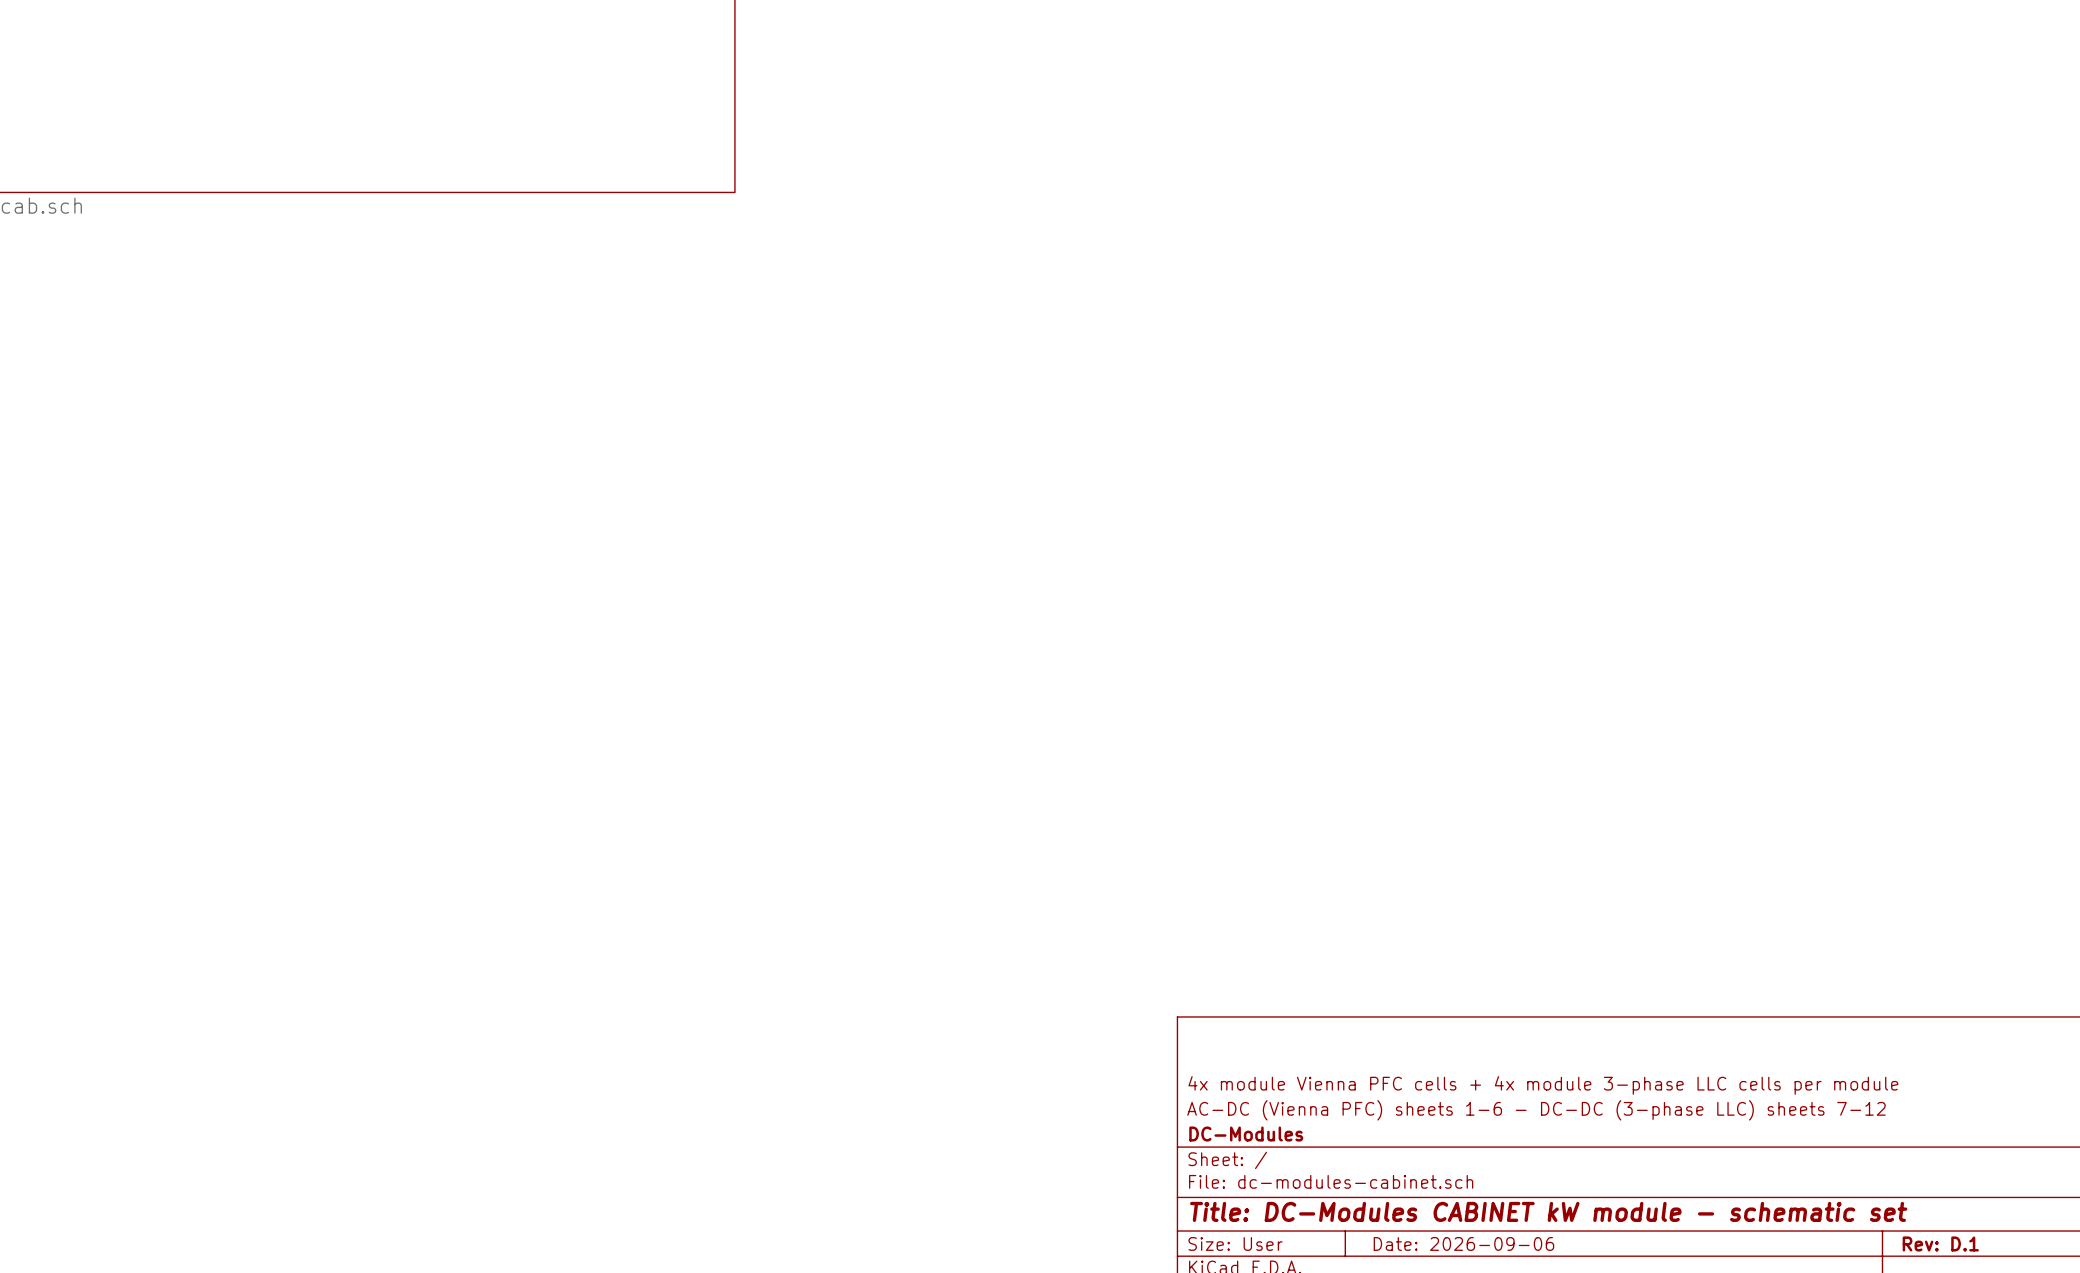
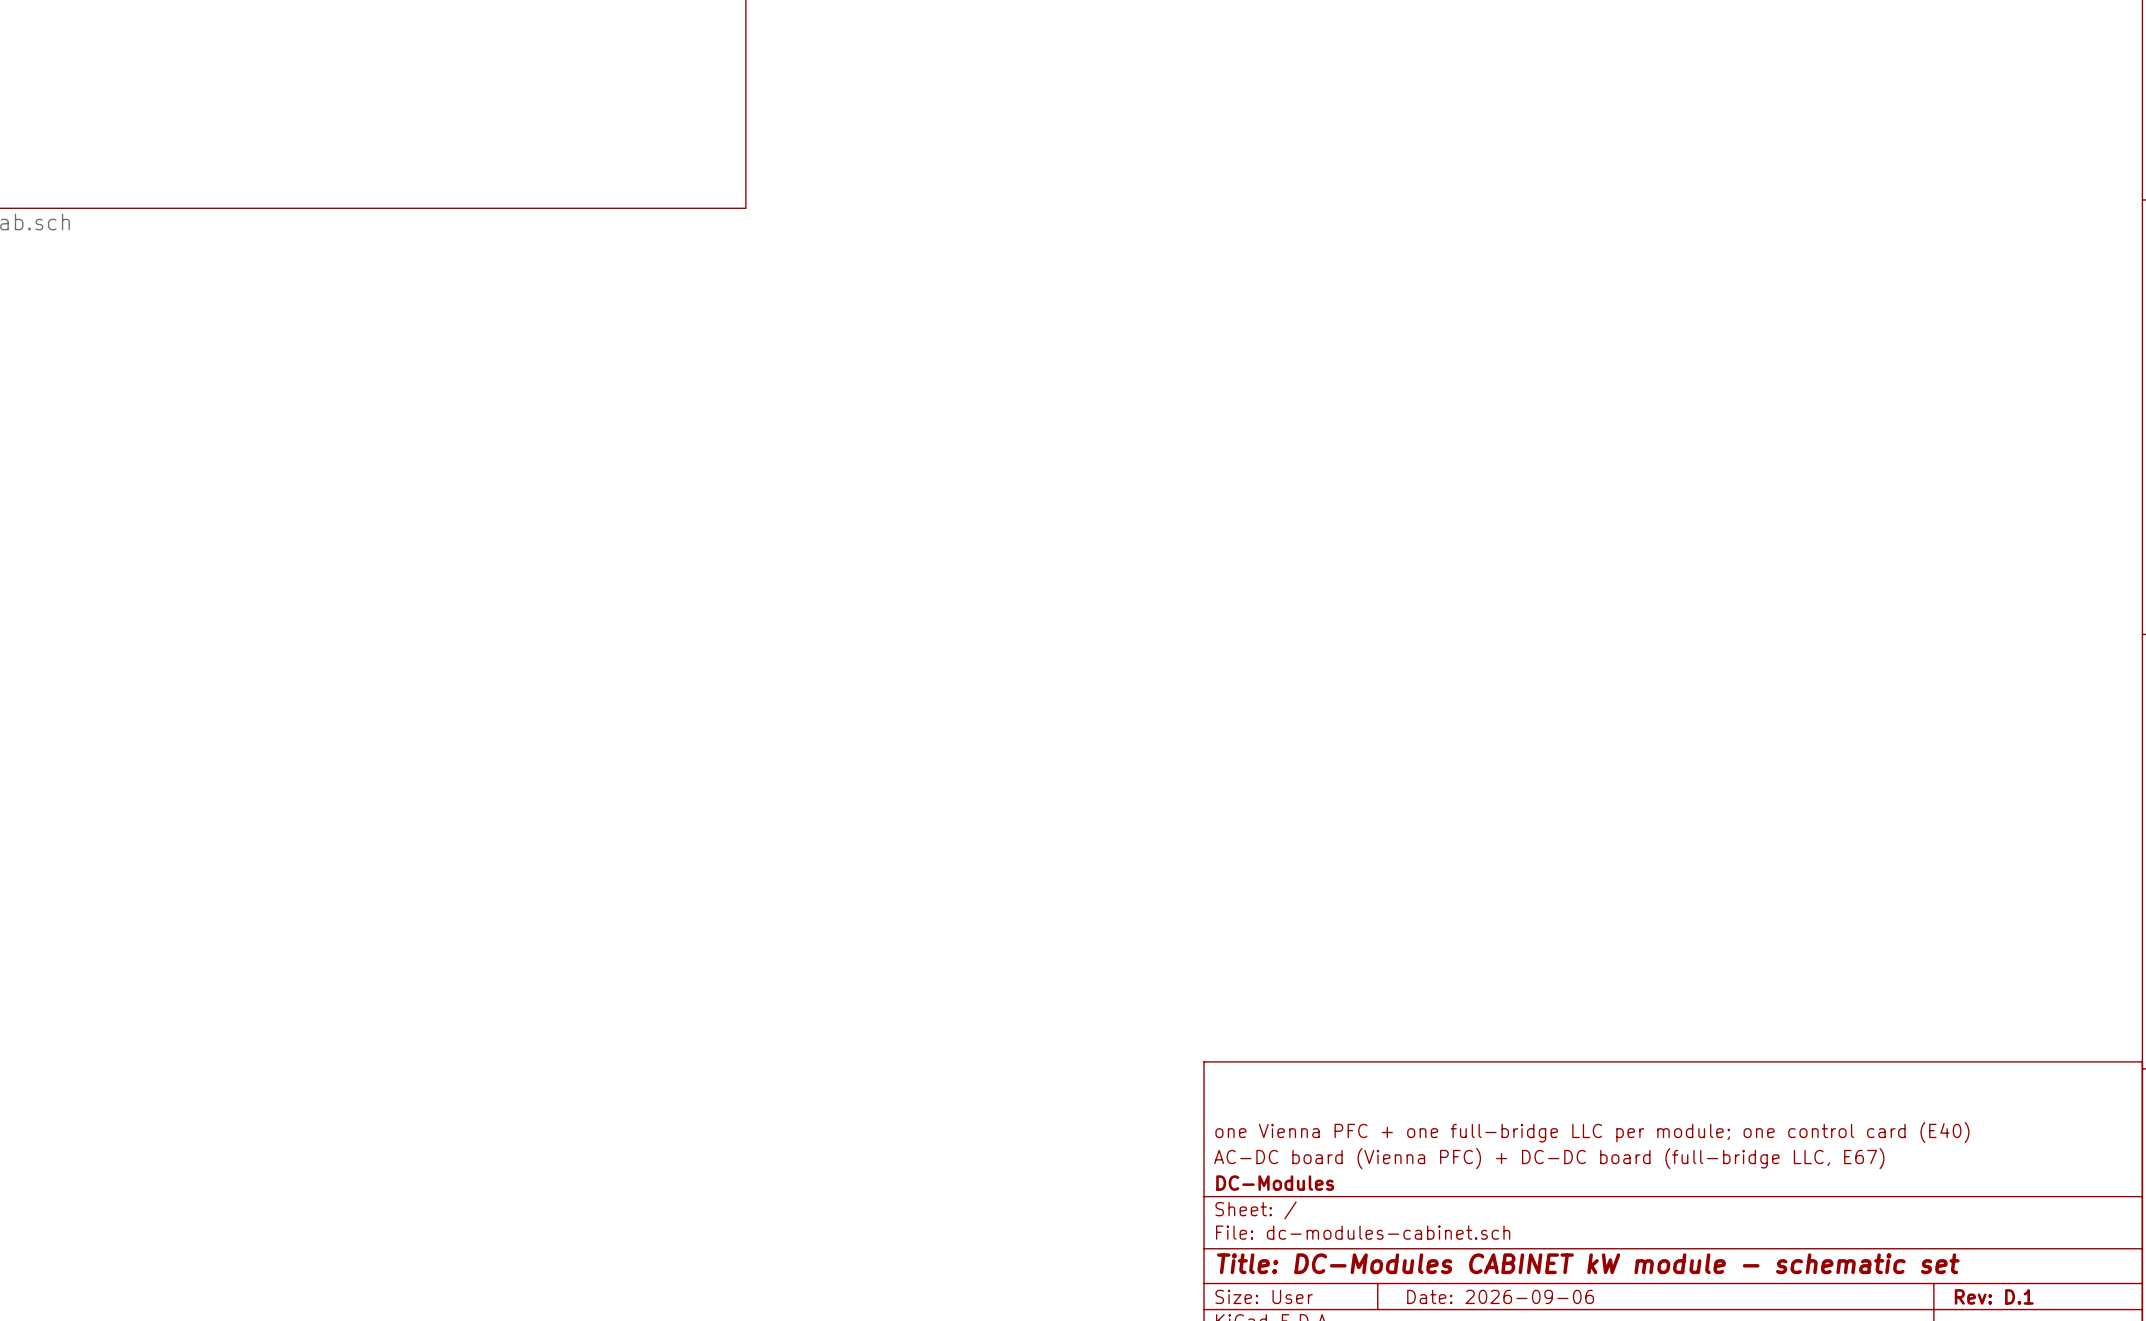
title block: 4x module Vienna PFC cells + 4x module 3-phase LLC cells per module (1543, 1085) -> one Vienna PFC + one full-bridge LLC per module; one control card (E40) (1592, 1132)
title block: AC-DC (Vienna PFC) sheets 1-6 - DC-DC (3-phase LLC) sheets 7-12 (1536, 1110) -> AC-DC board (Vienna PFC) + DC-DC board (full-bridge LLC, E67) (1549, 1158)

